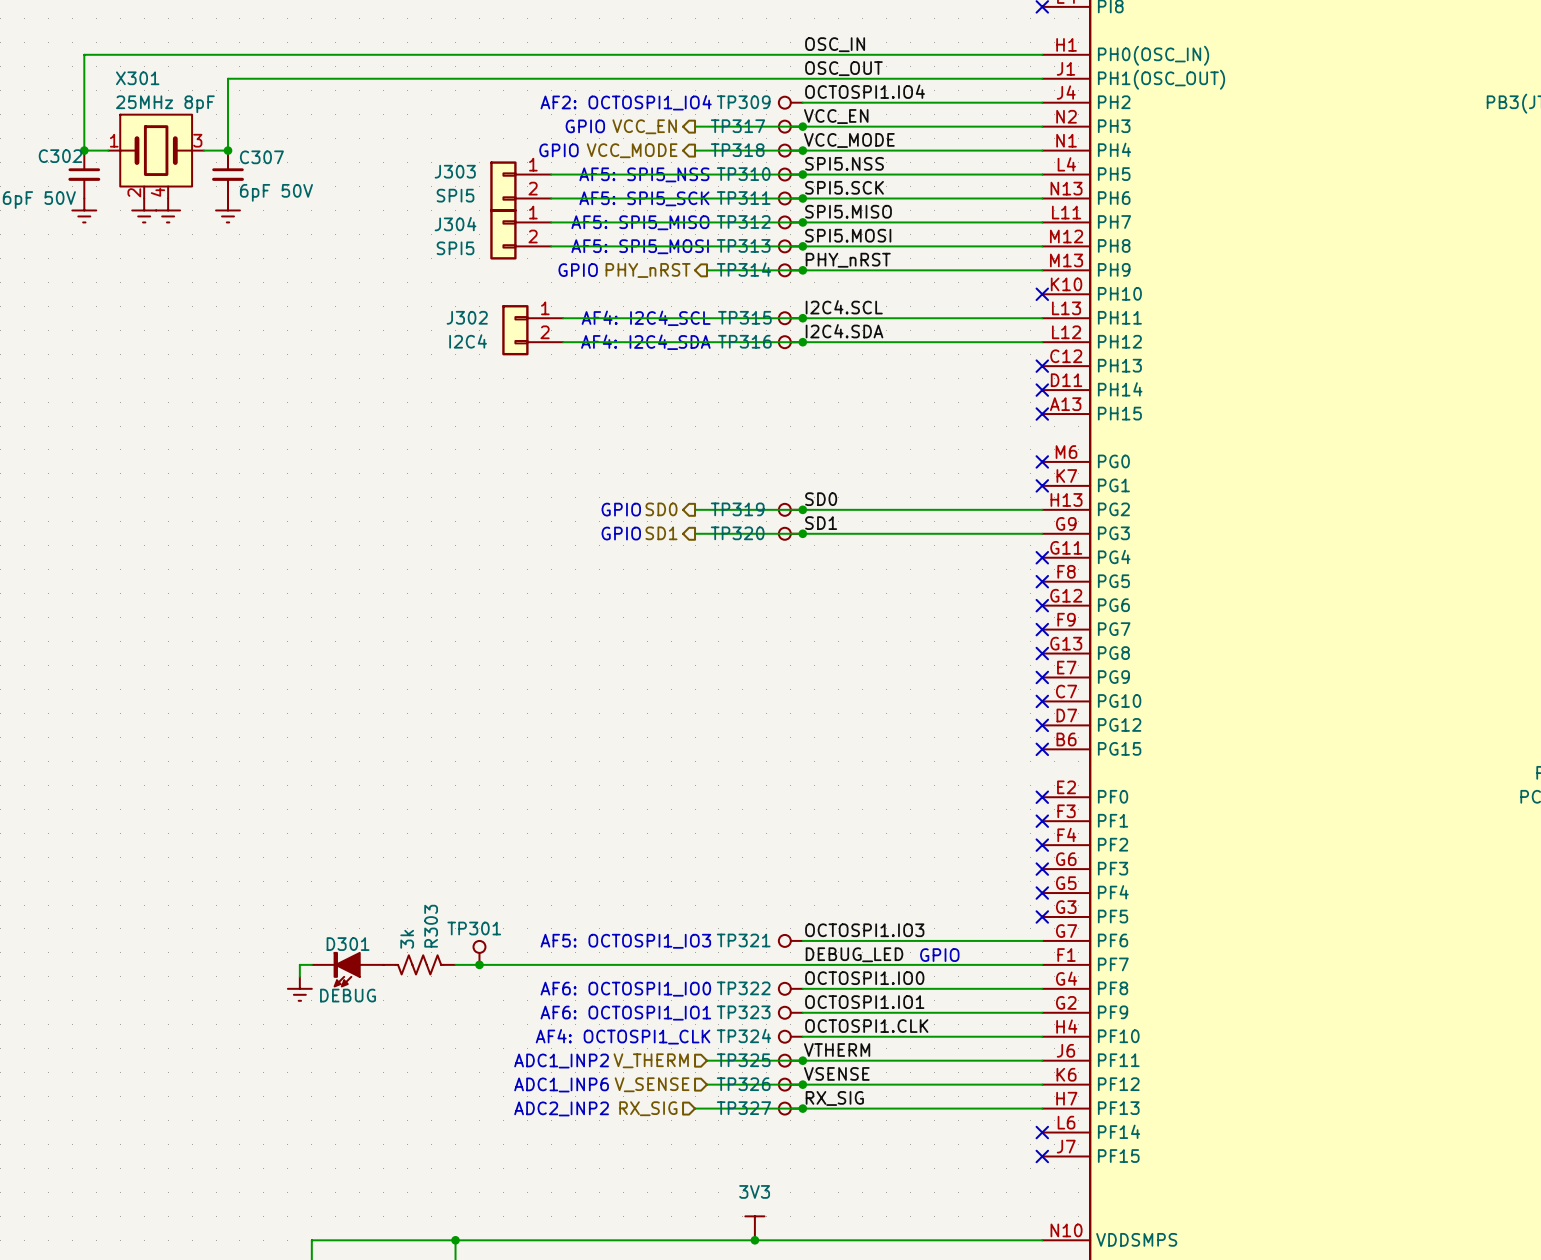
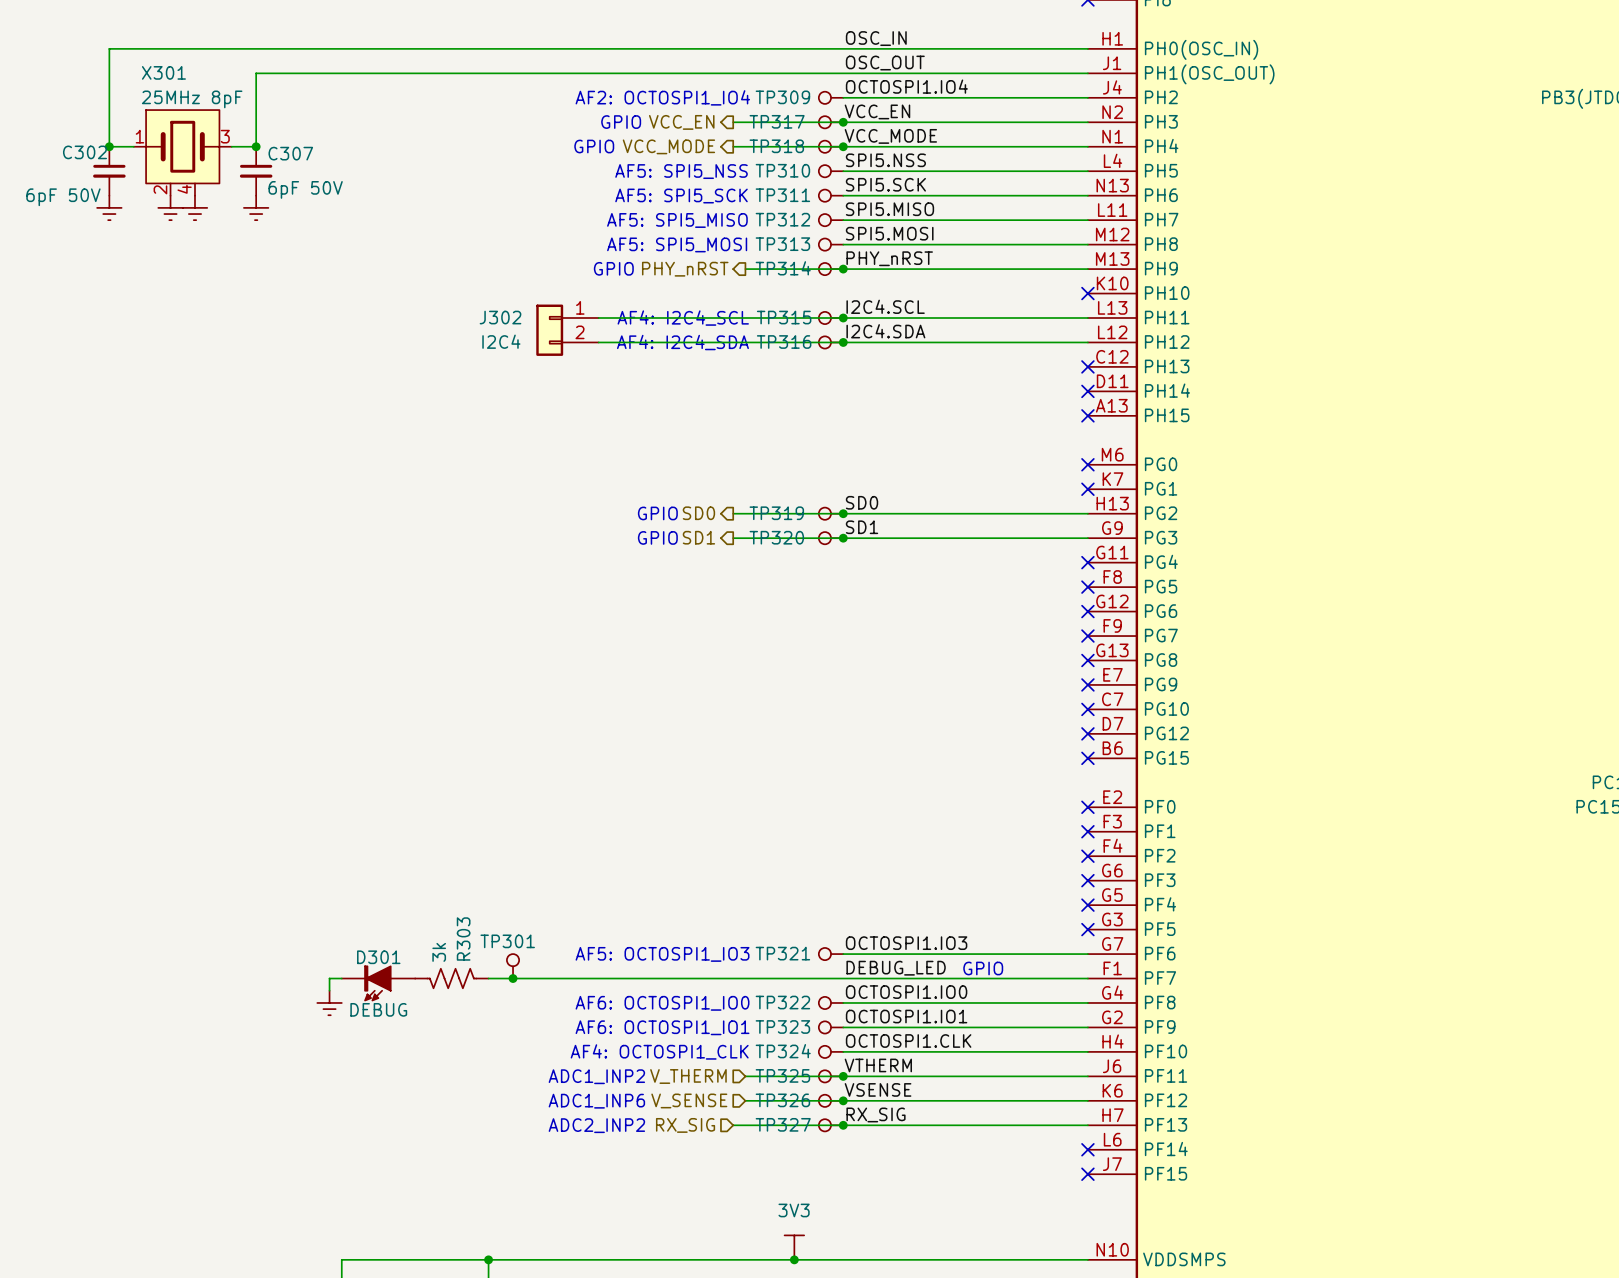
wire: (551, 174) (802, 174) -> none
junction: (802, 174) -> none
J303: SPI5 (520, 186) -> none
wire: (551, 198) (802, 198) -> none
junction: (802, 198) -> none
wire: (551, 222) (802, 222) -> none
junction: (802, 222) -> none
J304: SPI5 (520, 234) -> none
wire: (551, 246) (802, 246) -> none
junction: (802, 246) -> none

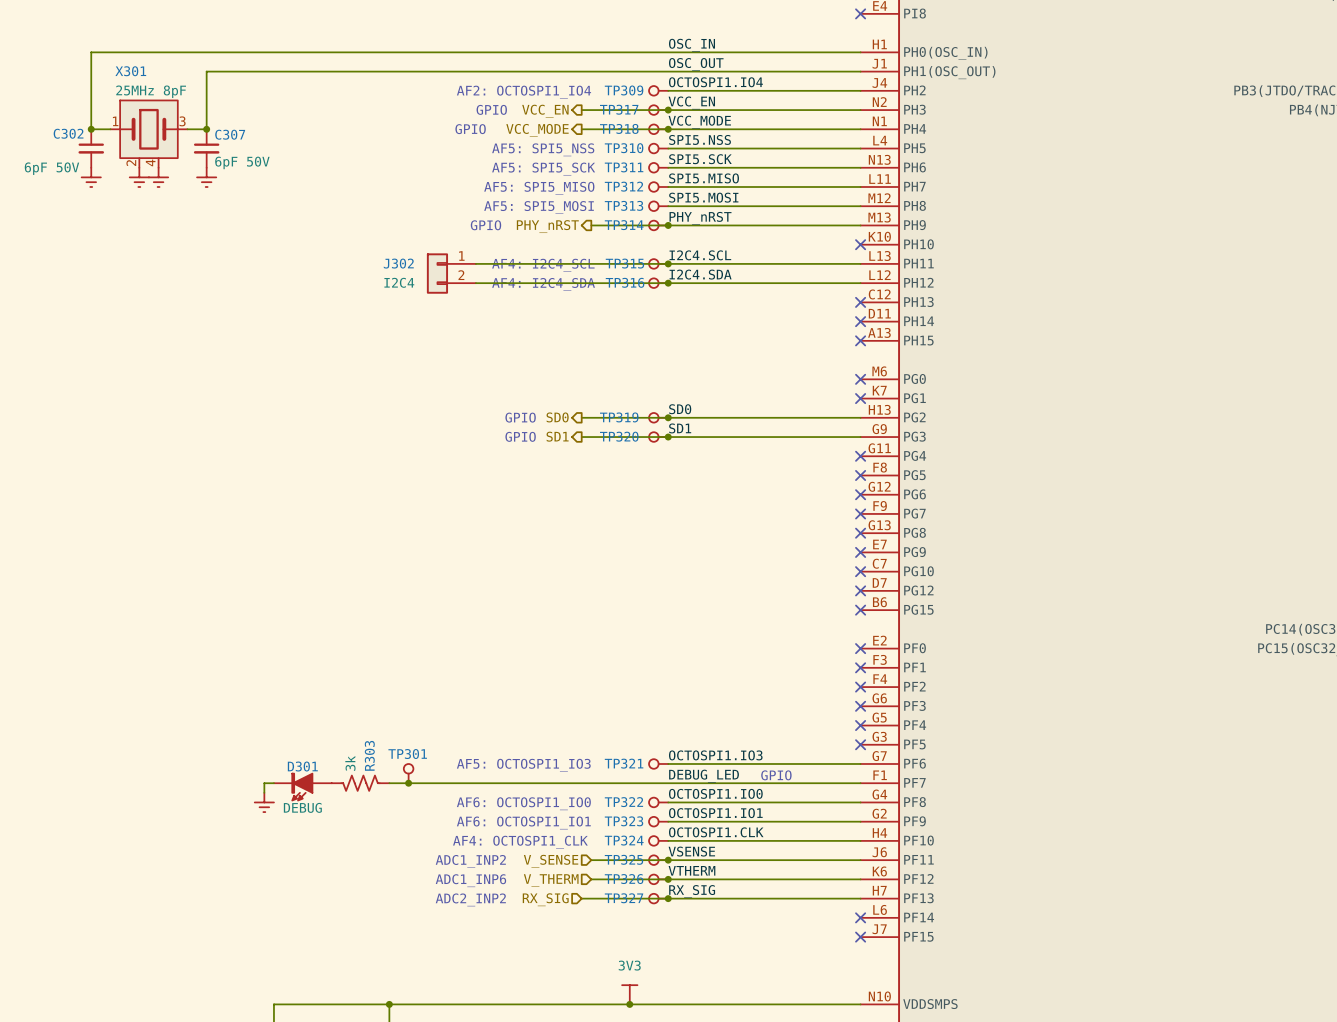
label: VTHERM (878, 1065) -> VSENSE (691, 851)
hierarchical label: V_THERM (688, 1076) -> V_SENSE (551, 861)
label: VSENSE (878, 1089) -> VTHERM (691, 870)
hierarchical label: V_SENSE (689, 1100) -> V_THERM (551, 880)

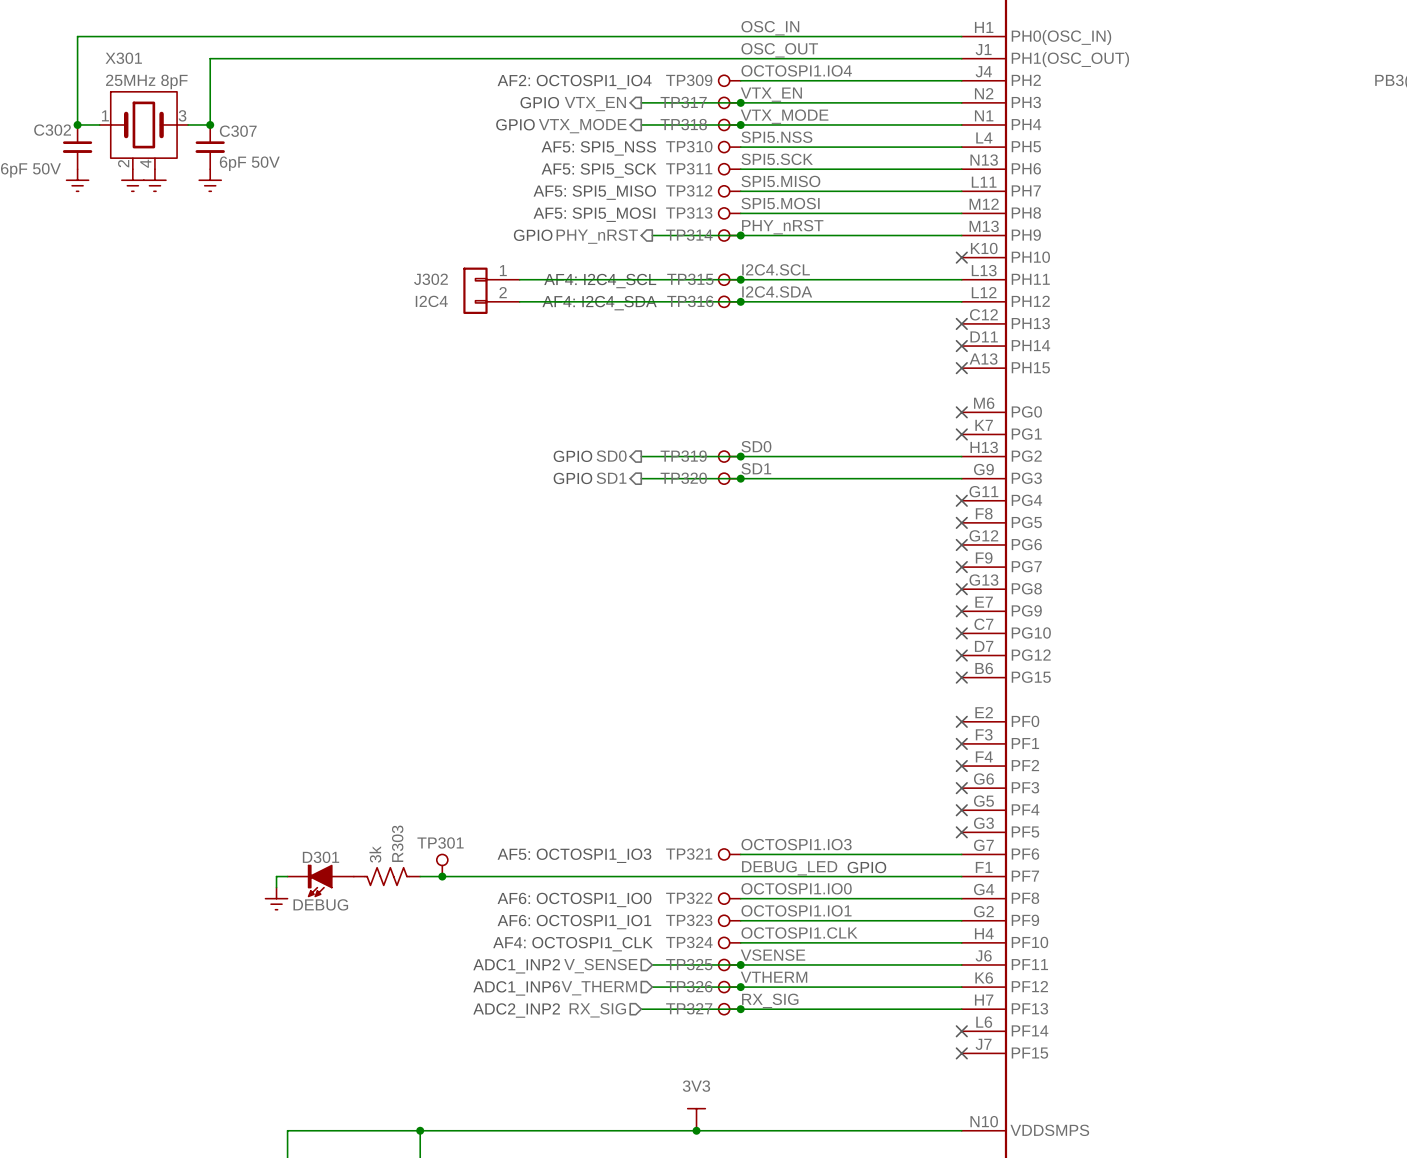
label: VCC_EN (691, 102) -> VTX_EN (771, 94)
hierarchical label: VCC_EN (545, 111) -> VTX_EN (595, 104)
label: VCC_MODE (699, 122) -> VTX_MODE (784, 116)
hierarchical label: VCC_MODE (537, 130) -> VTX_MODE (582, 126)

